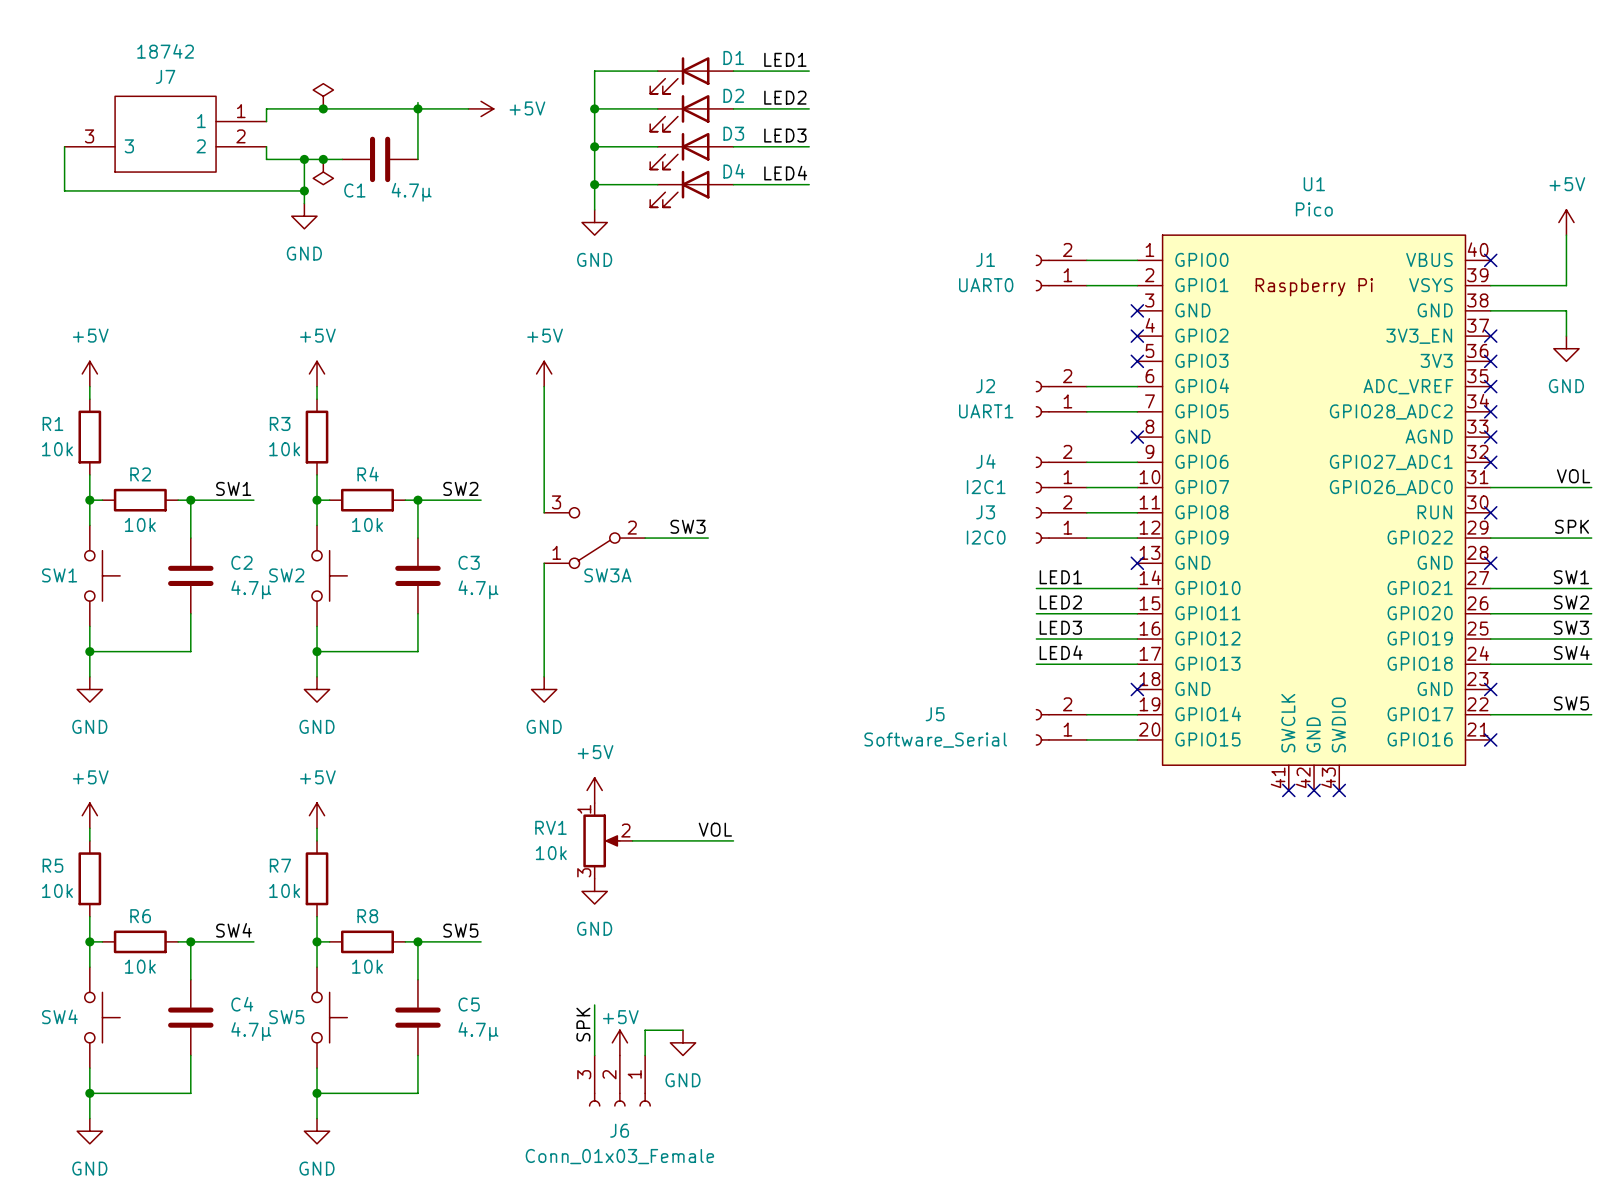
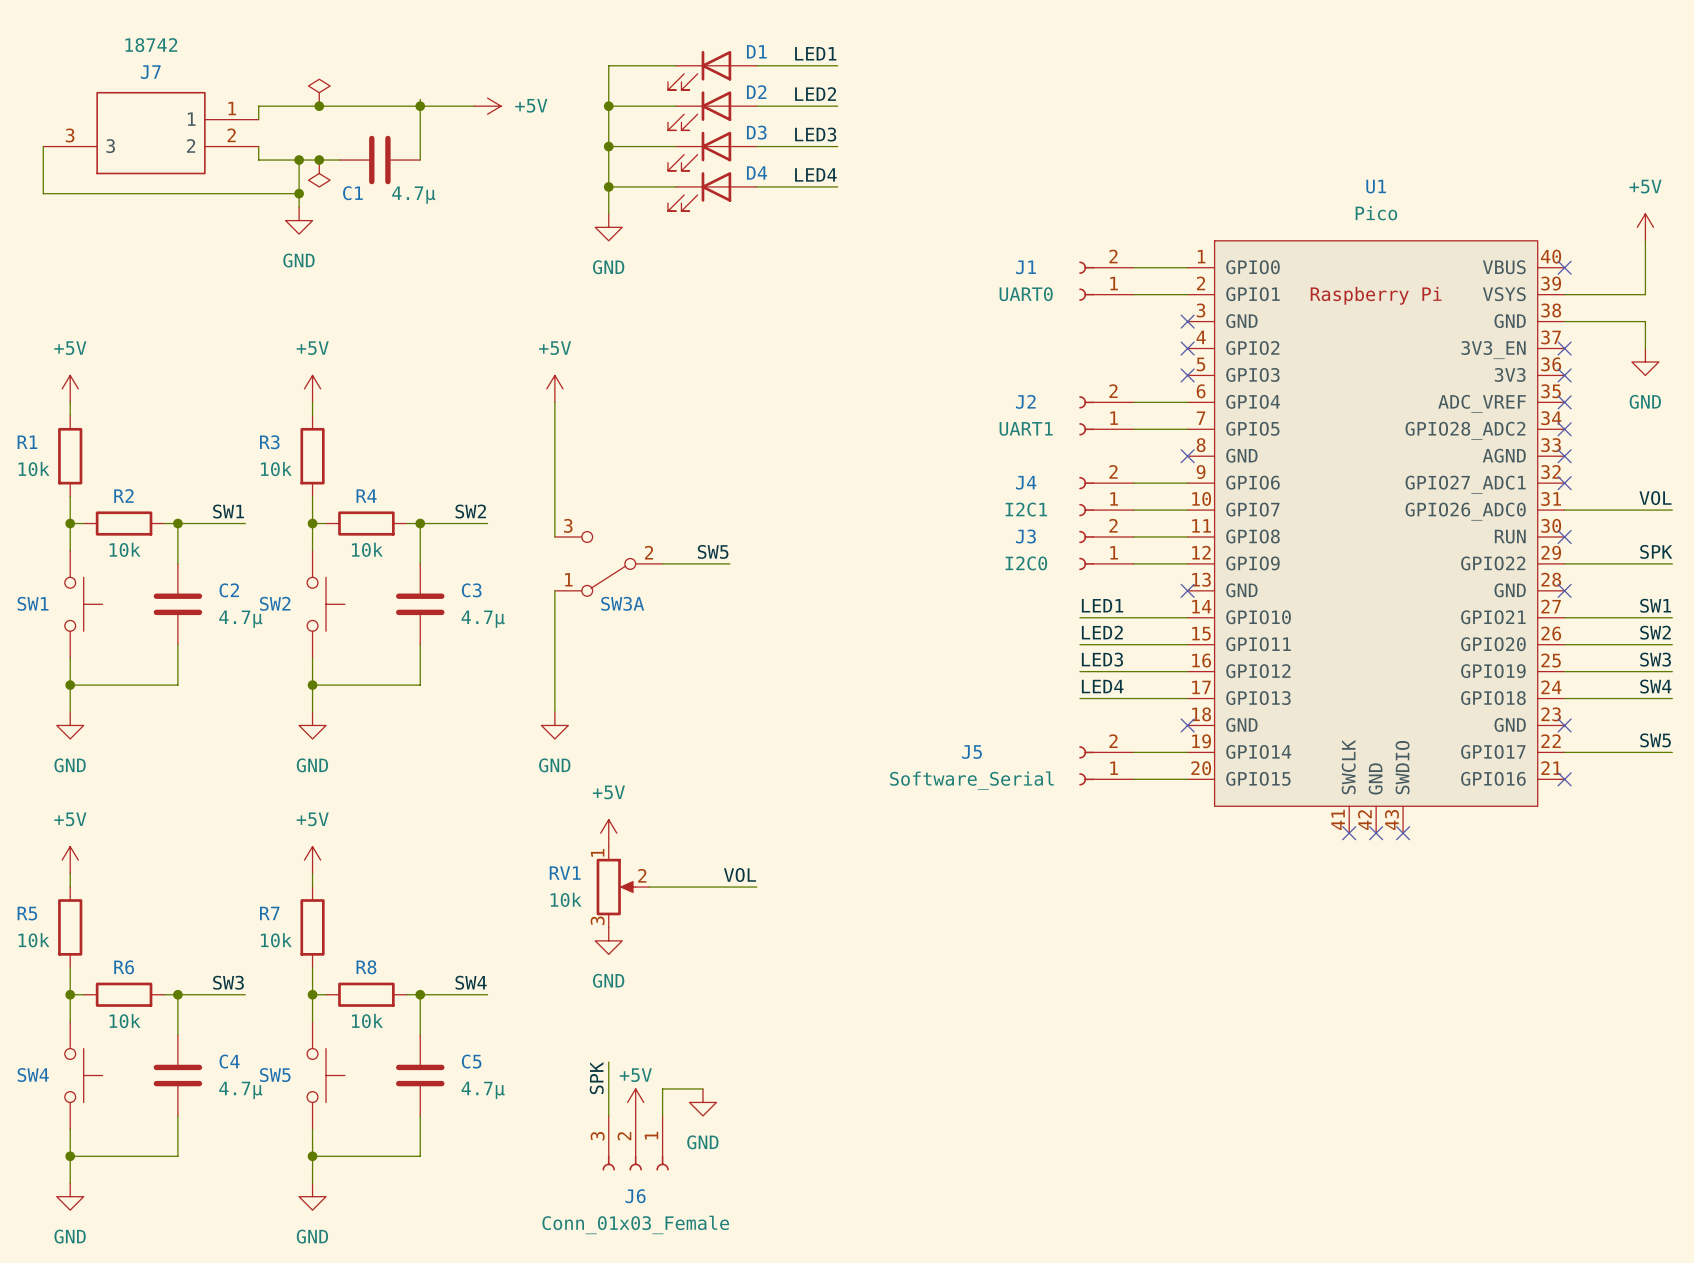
label: SW3 (688, 526) -> SW5 (713, 551)
label: SW4 (233, 930) -> SW3 (228, 982)
label: SW5 (460, 930) -> SW4 (471, 982)

